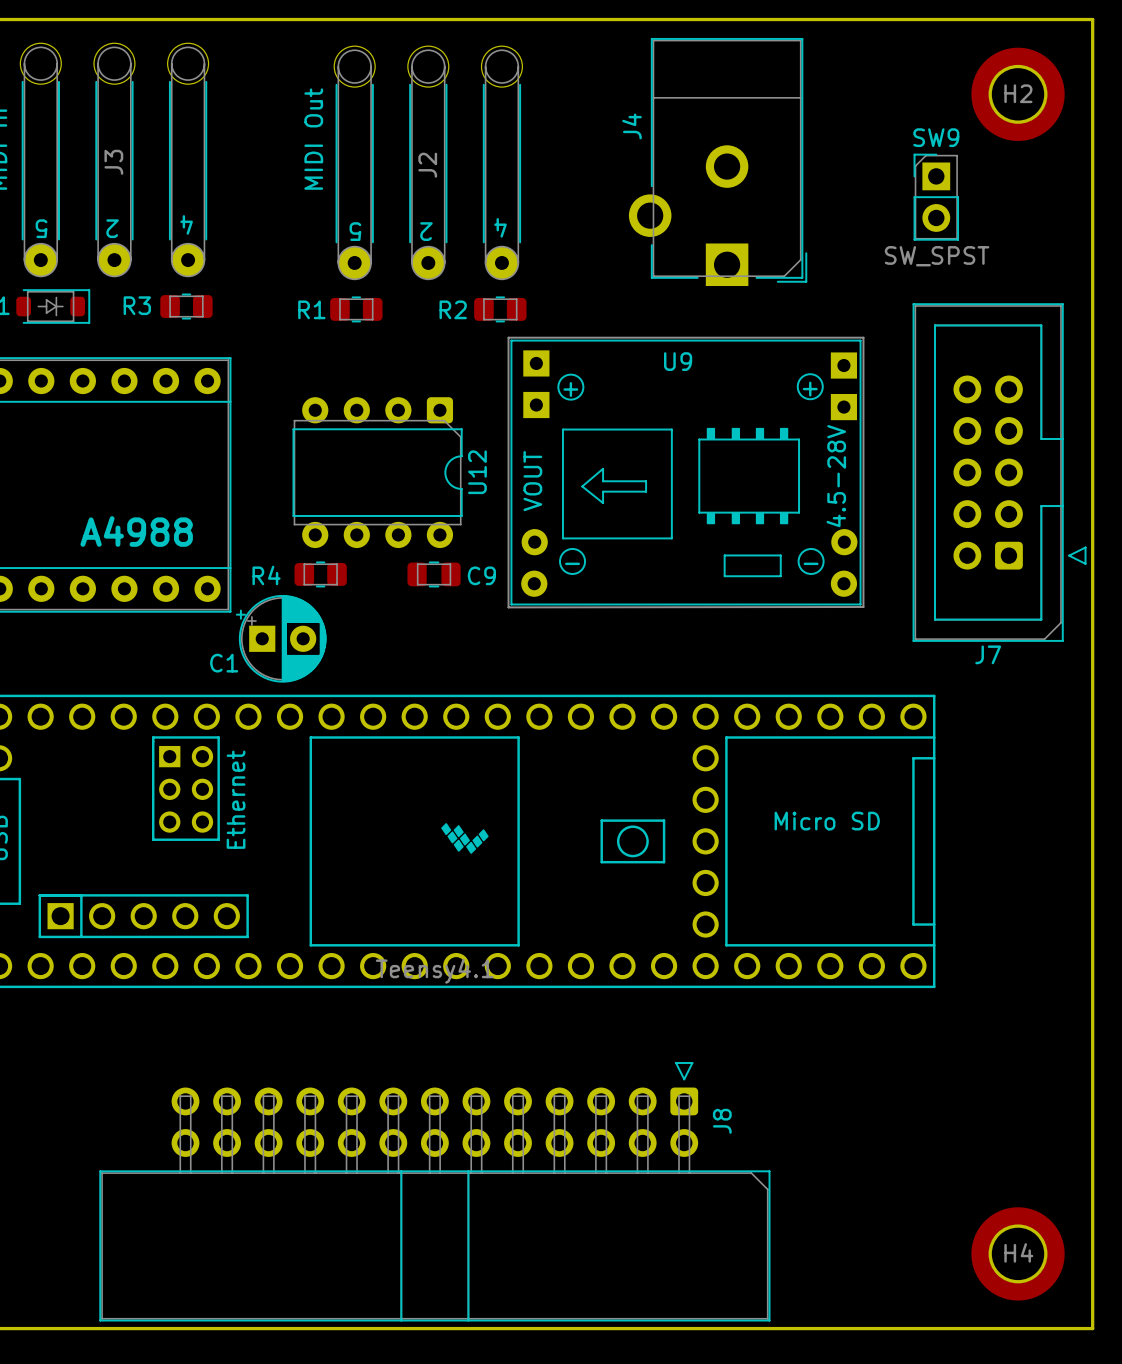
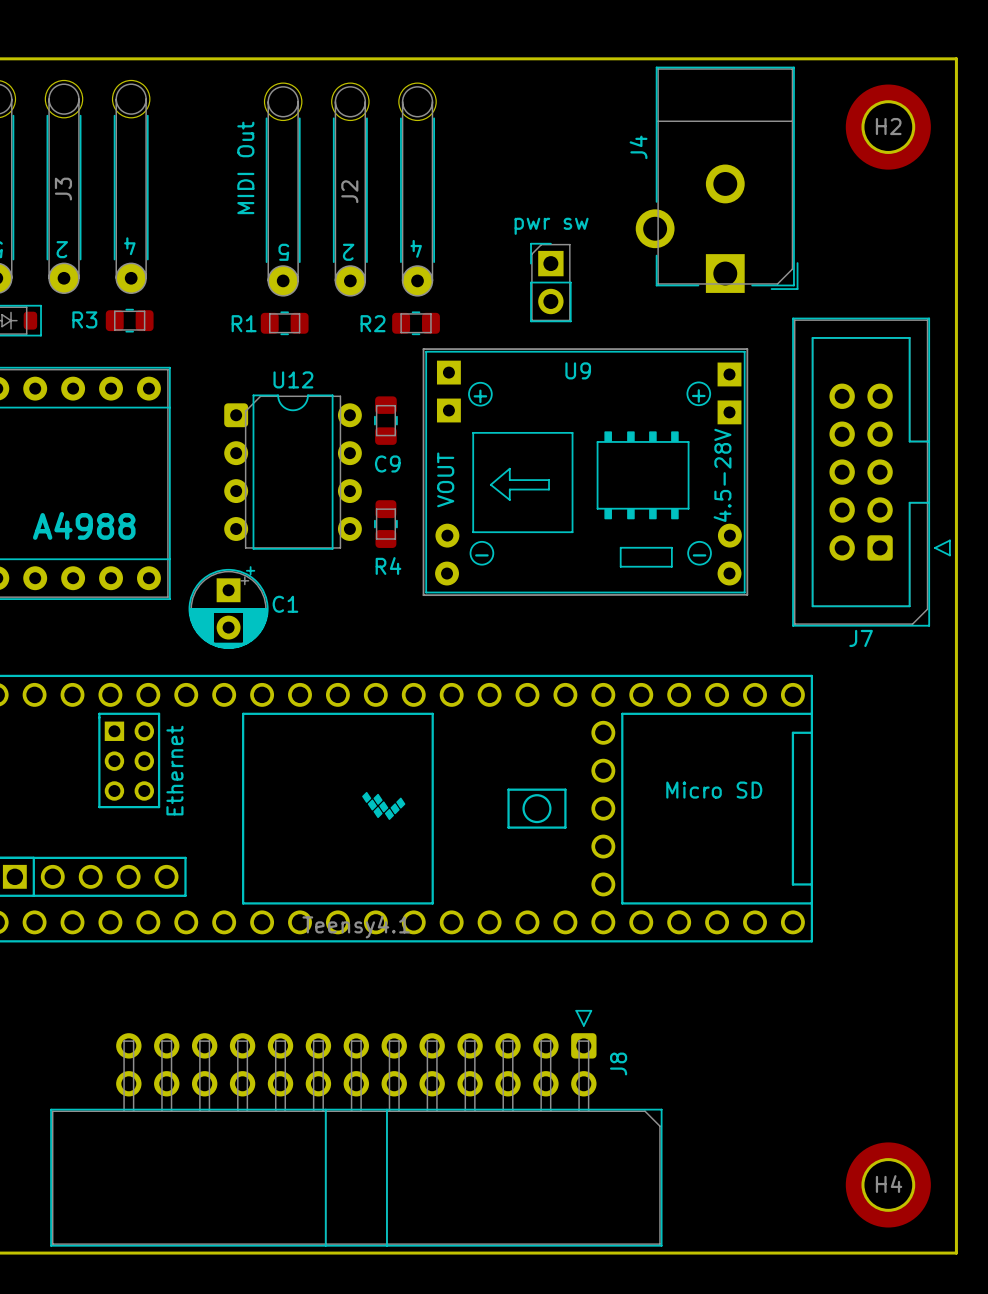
J4 position: (718, 161) -> (717, 179)
SW9: SW_SPST (936, 197) -> none
pwr sw: none -> (550, 282)
U12 rotation: 0° (377, 472) -> 90° counterclockwise (293, 472)
R4 rotation: 0° (320, 574) -> 90° clockwise (385, 524)
R4 position: (320, 574) -> (385, 524)
C9 rotation: 0° (434, 574) -> 90° clockwise (385, 420)
C9 position: (434, 574) -> (385, 420)
R4 name position: R4 (266, 575) -> R4 (388, 566)
C1 rotation: 0° (281, 638) -> 90° clockwise (228, 607)
C1 name position: C1 (224, 663) -> C1 (285, 604)

